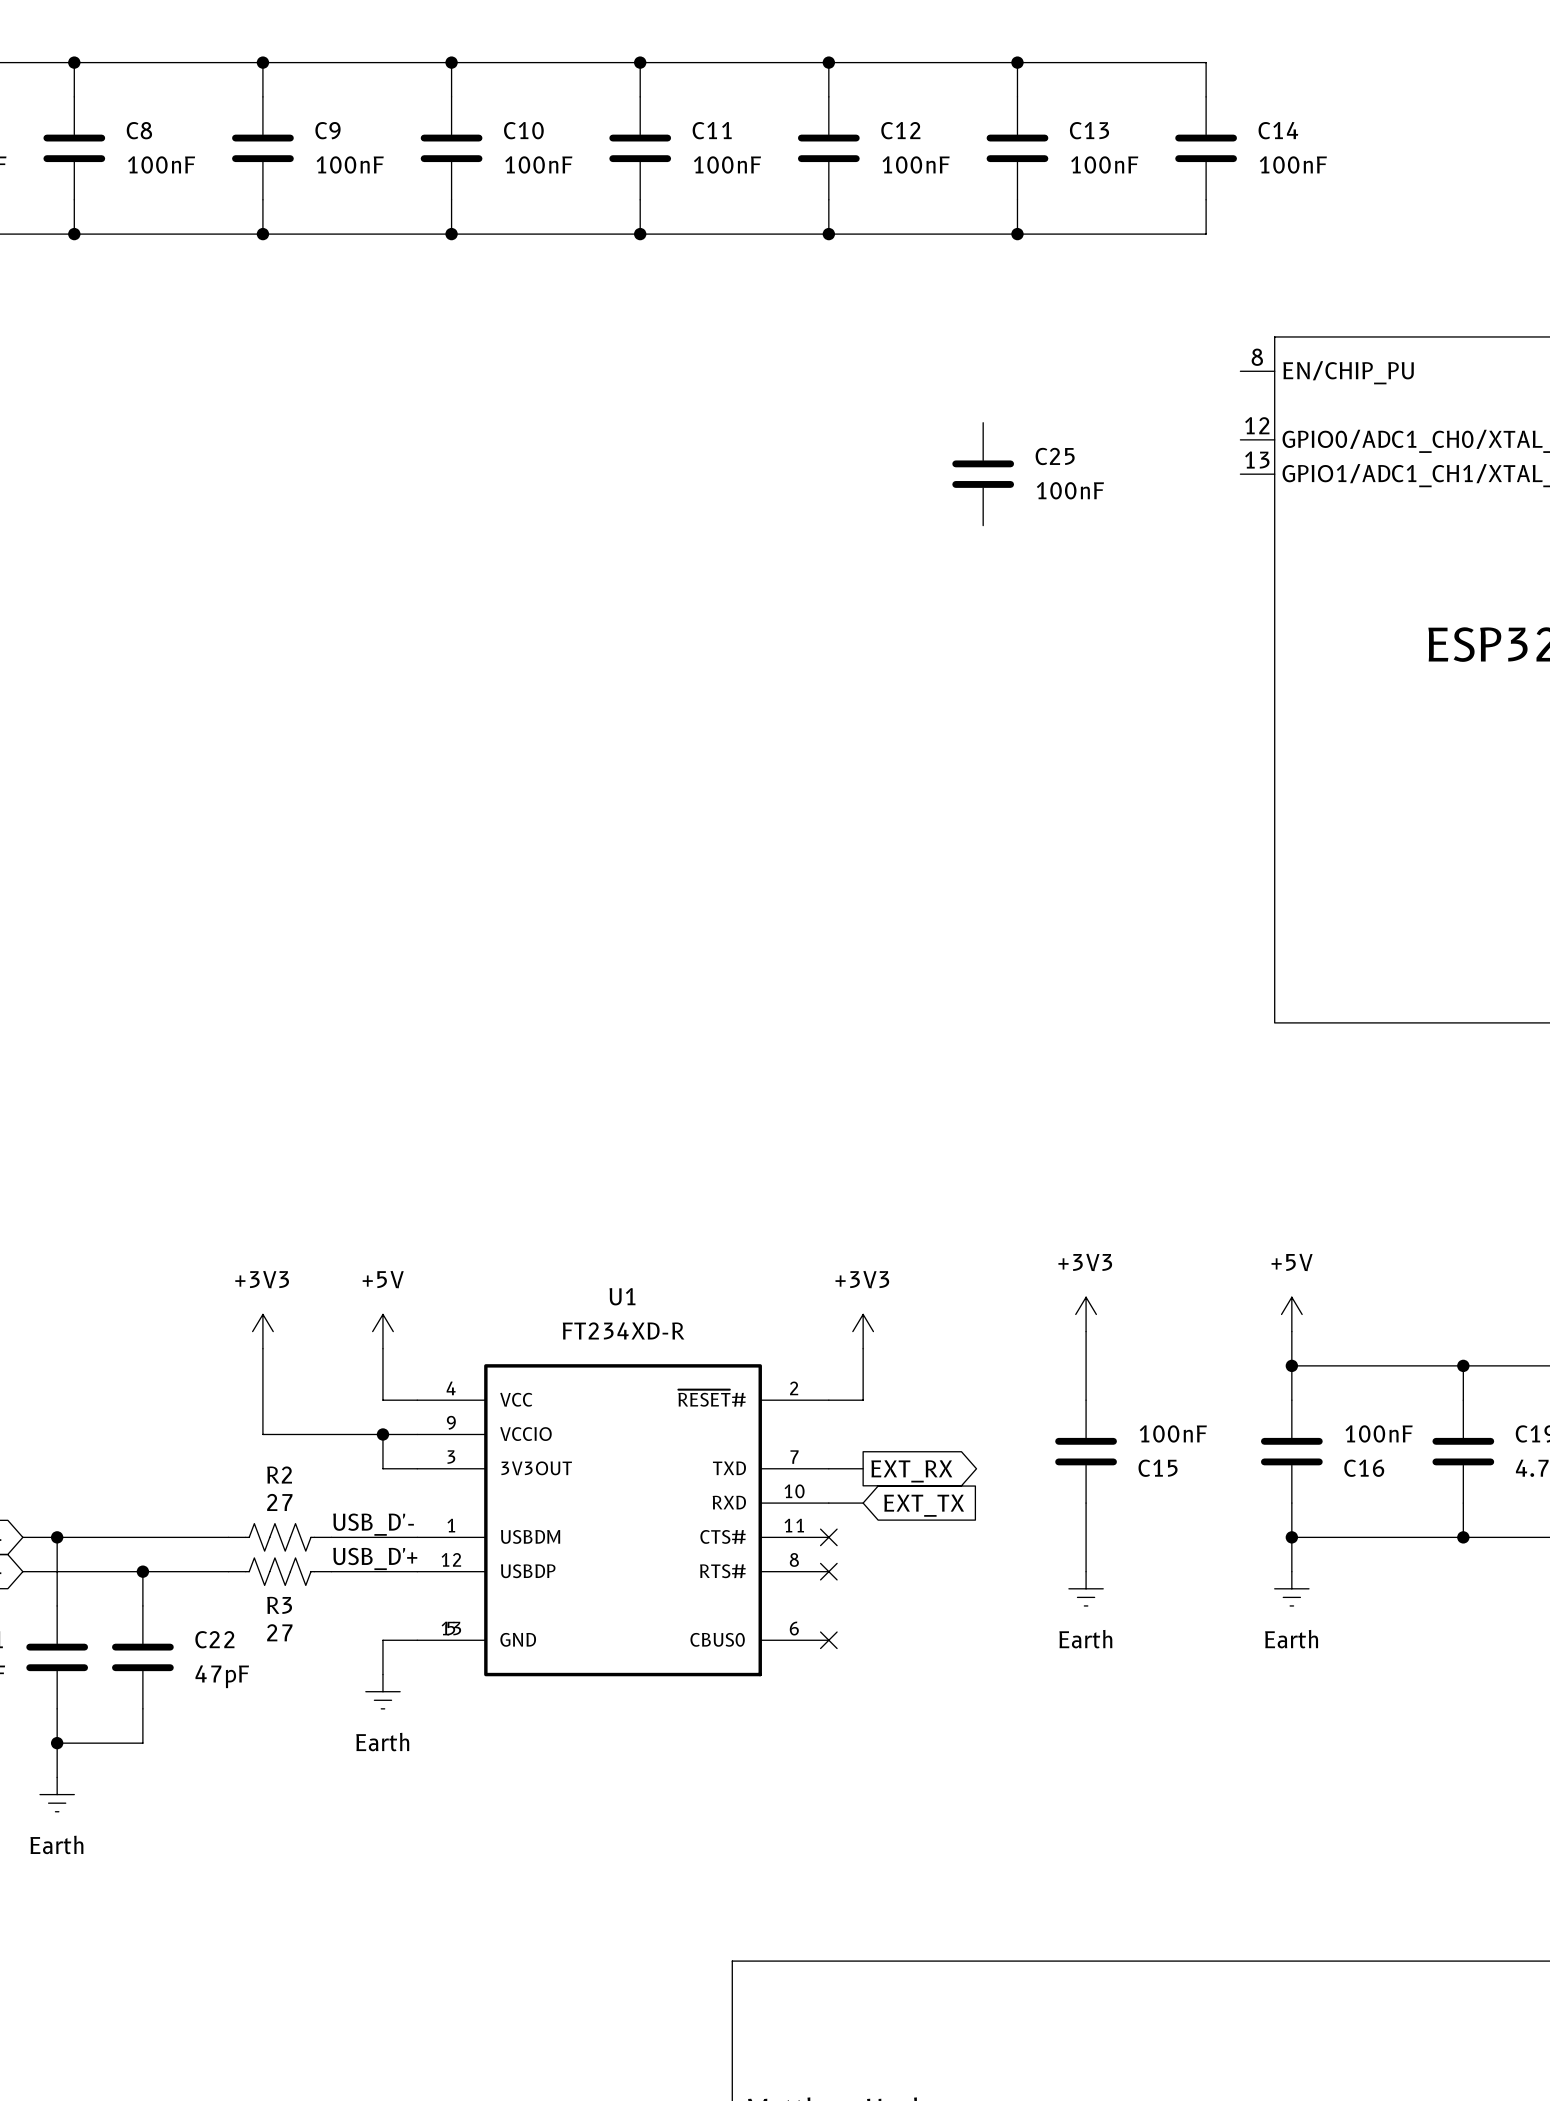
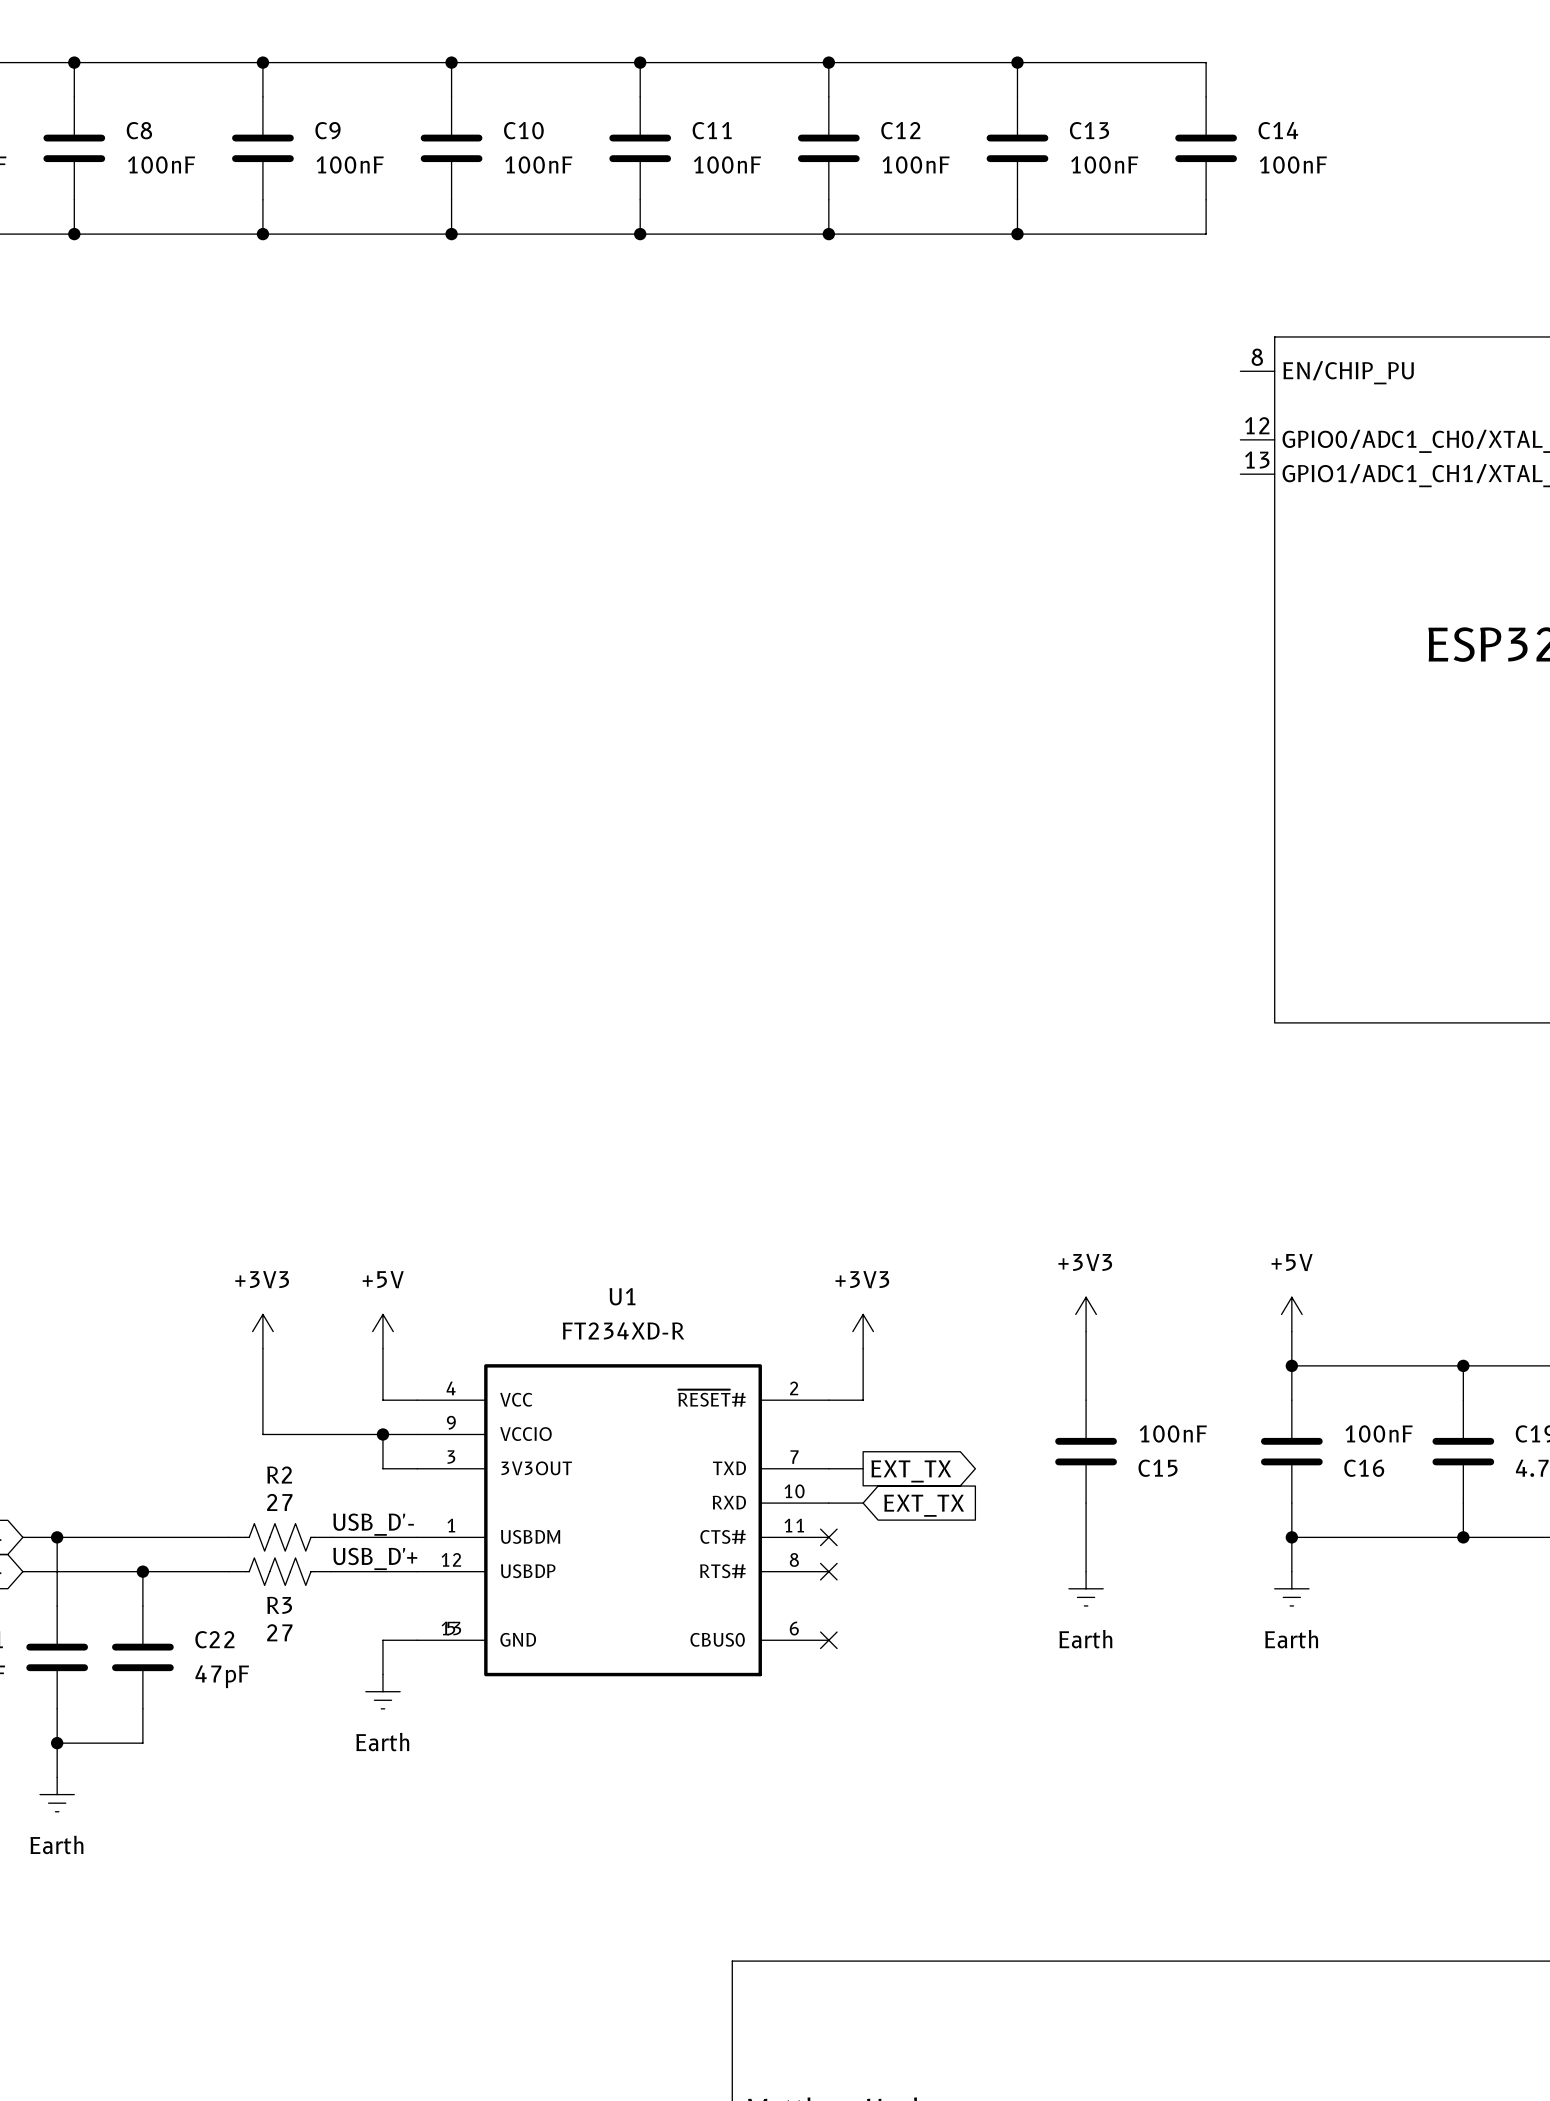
C25: 100nF (983, 474) -> none
global label: EXT_RX (911, 1471) -> EXT_TX (911, 1471)

